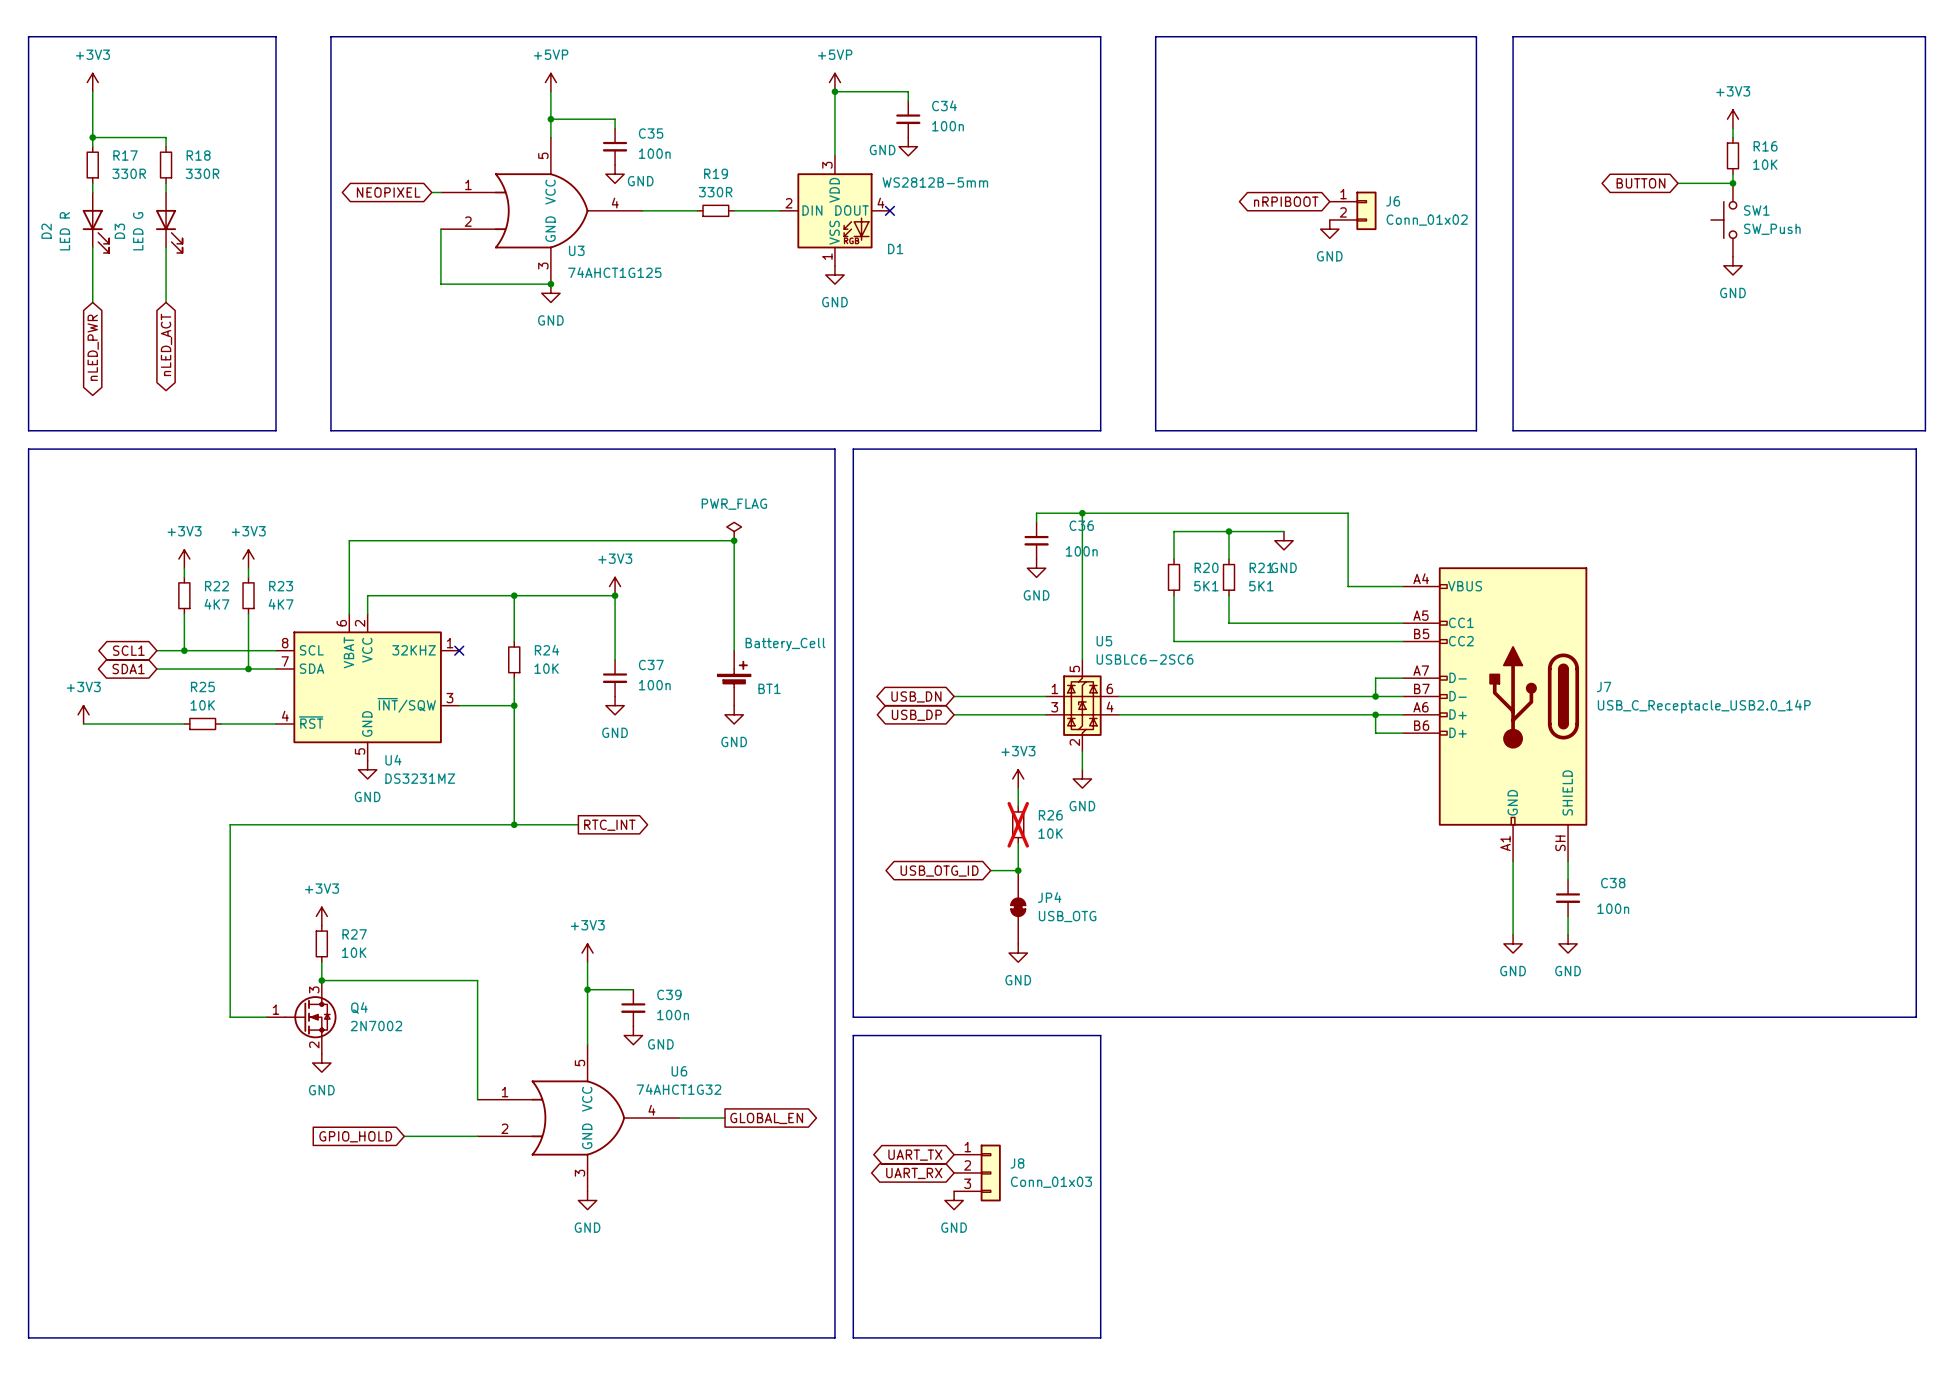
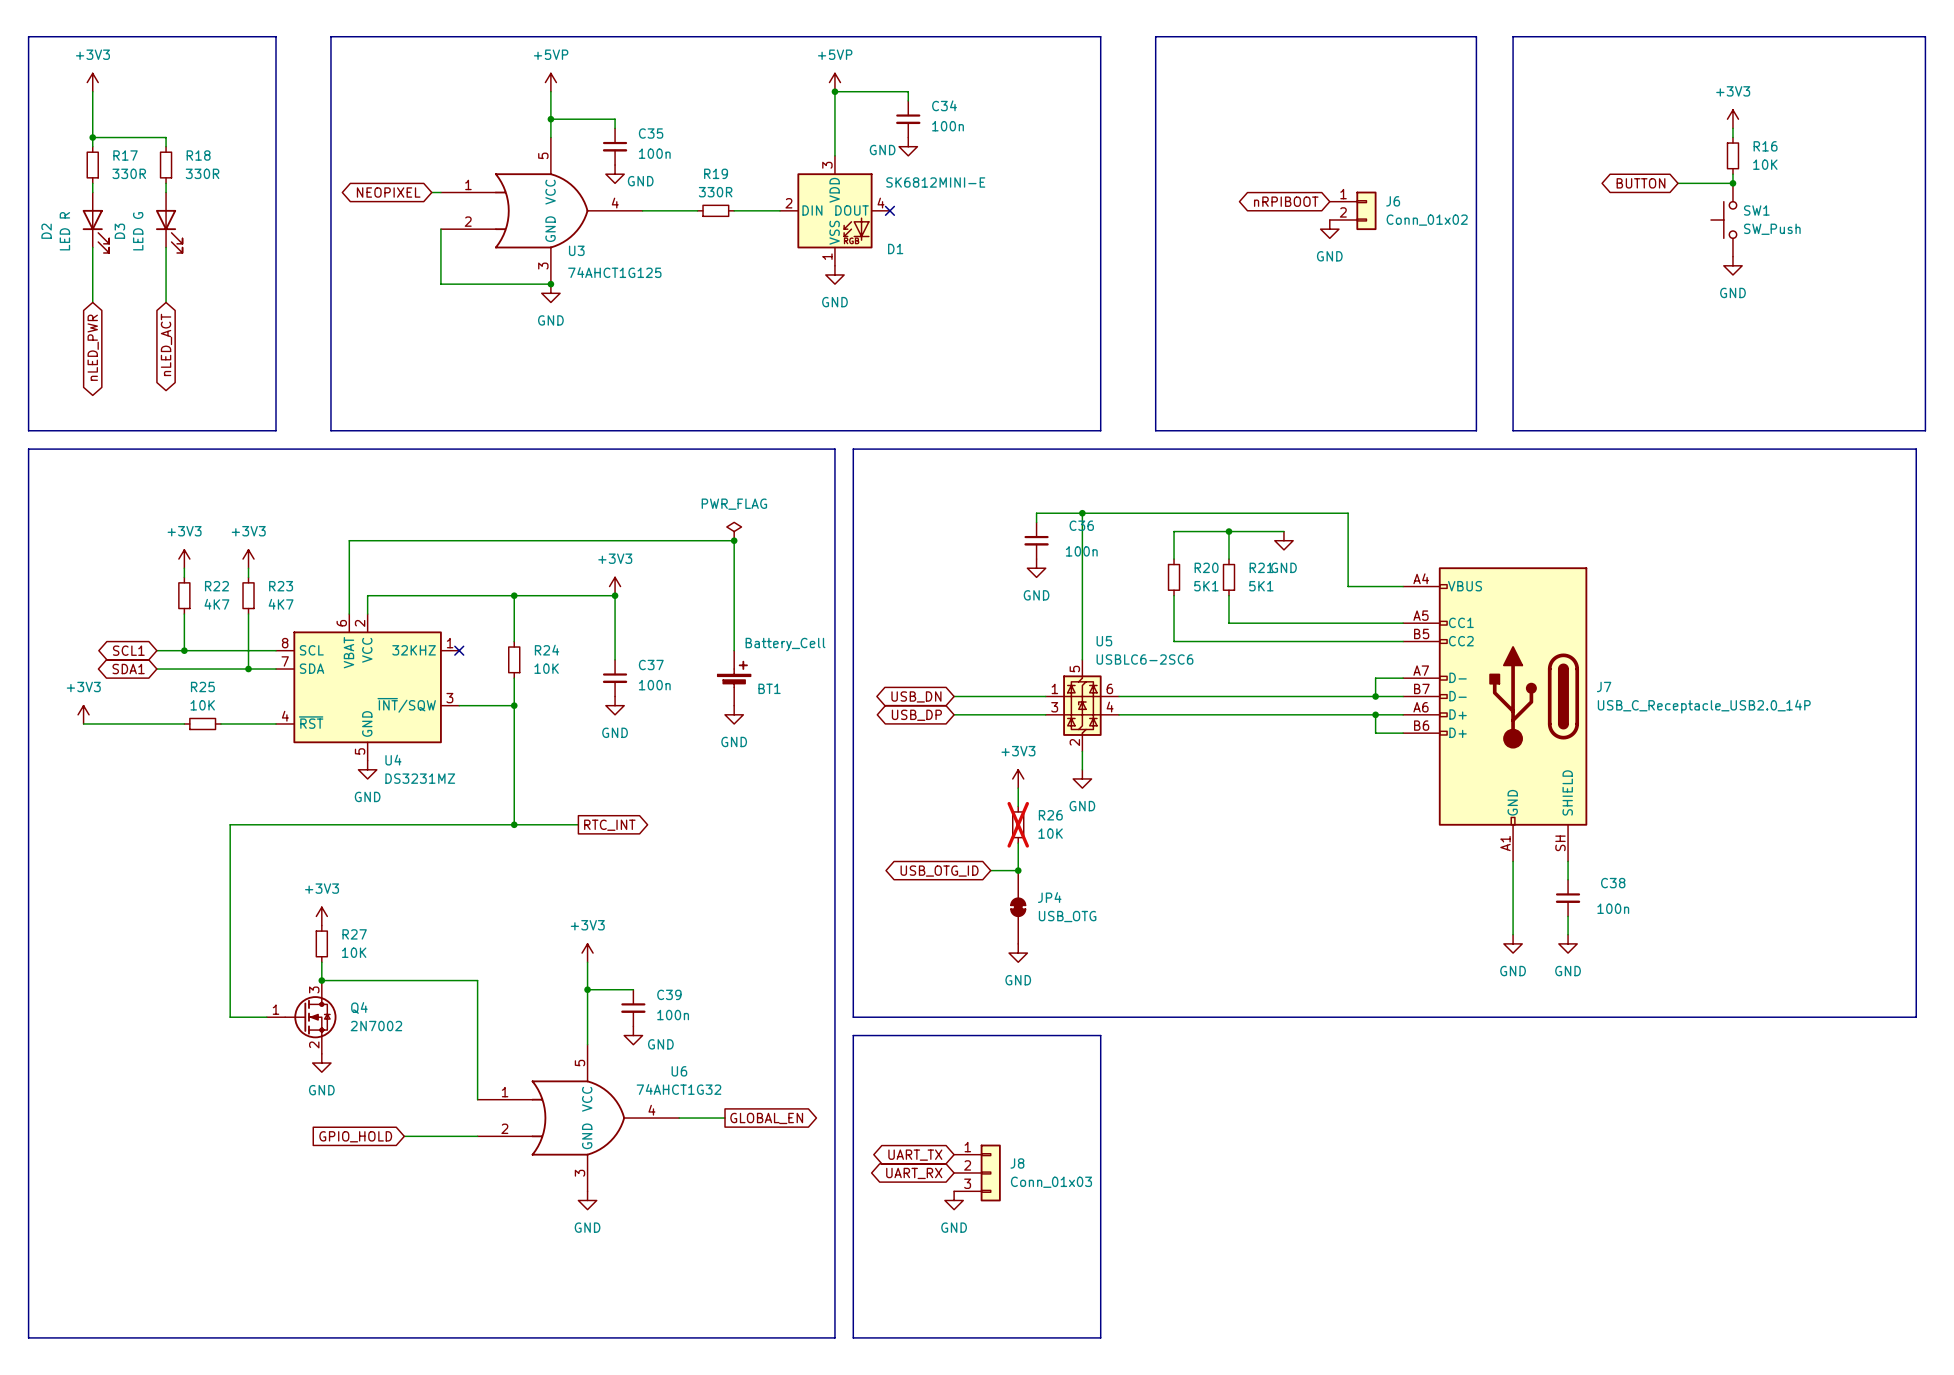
D1 value: WS2812B-5mm (935, 182) -> SK6812MINI-E (935, 182)

